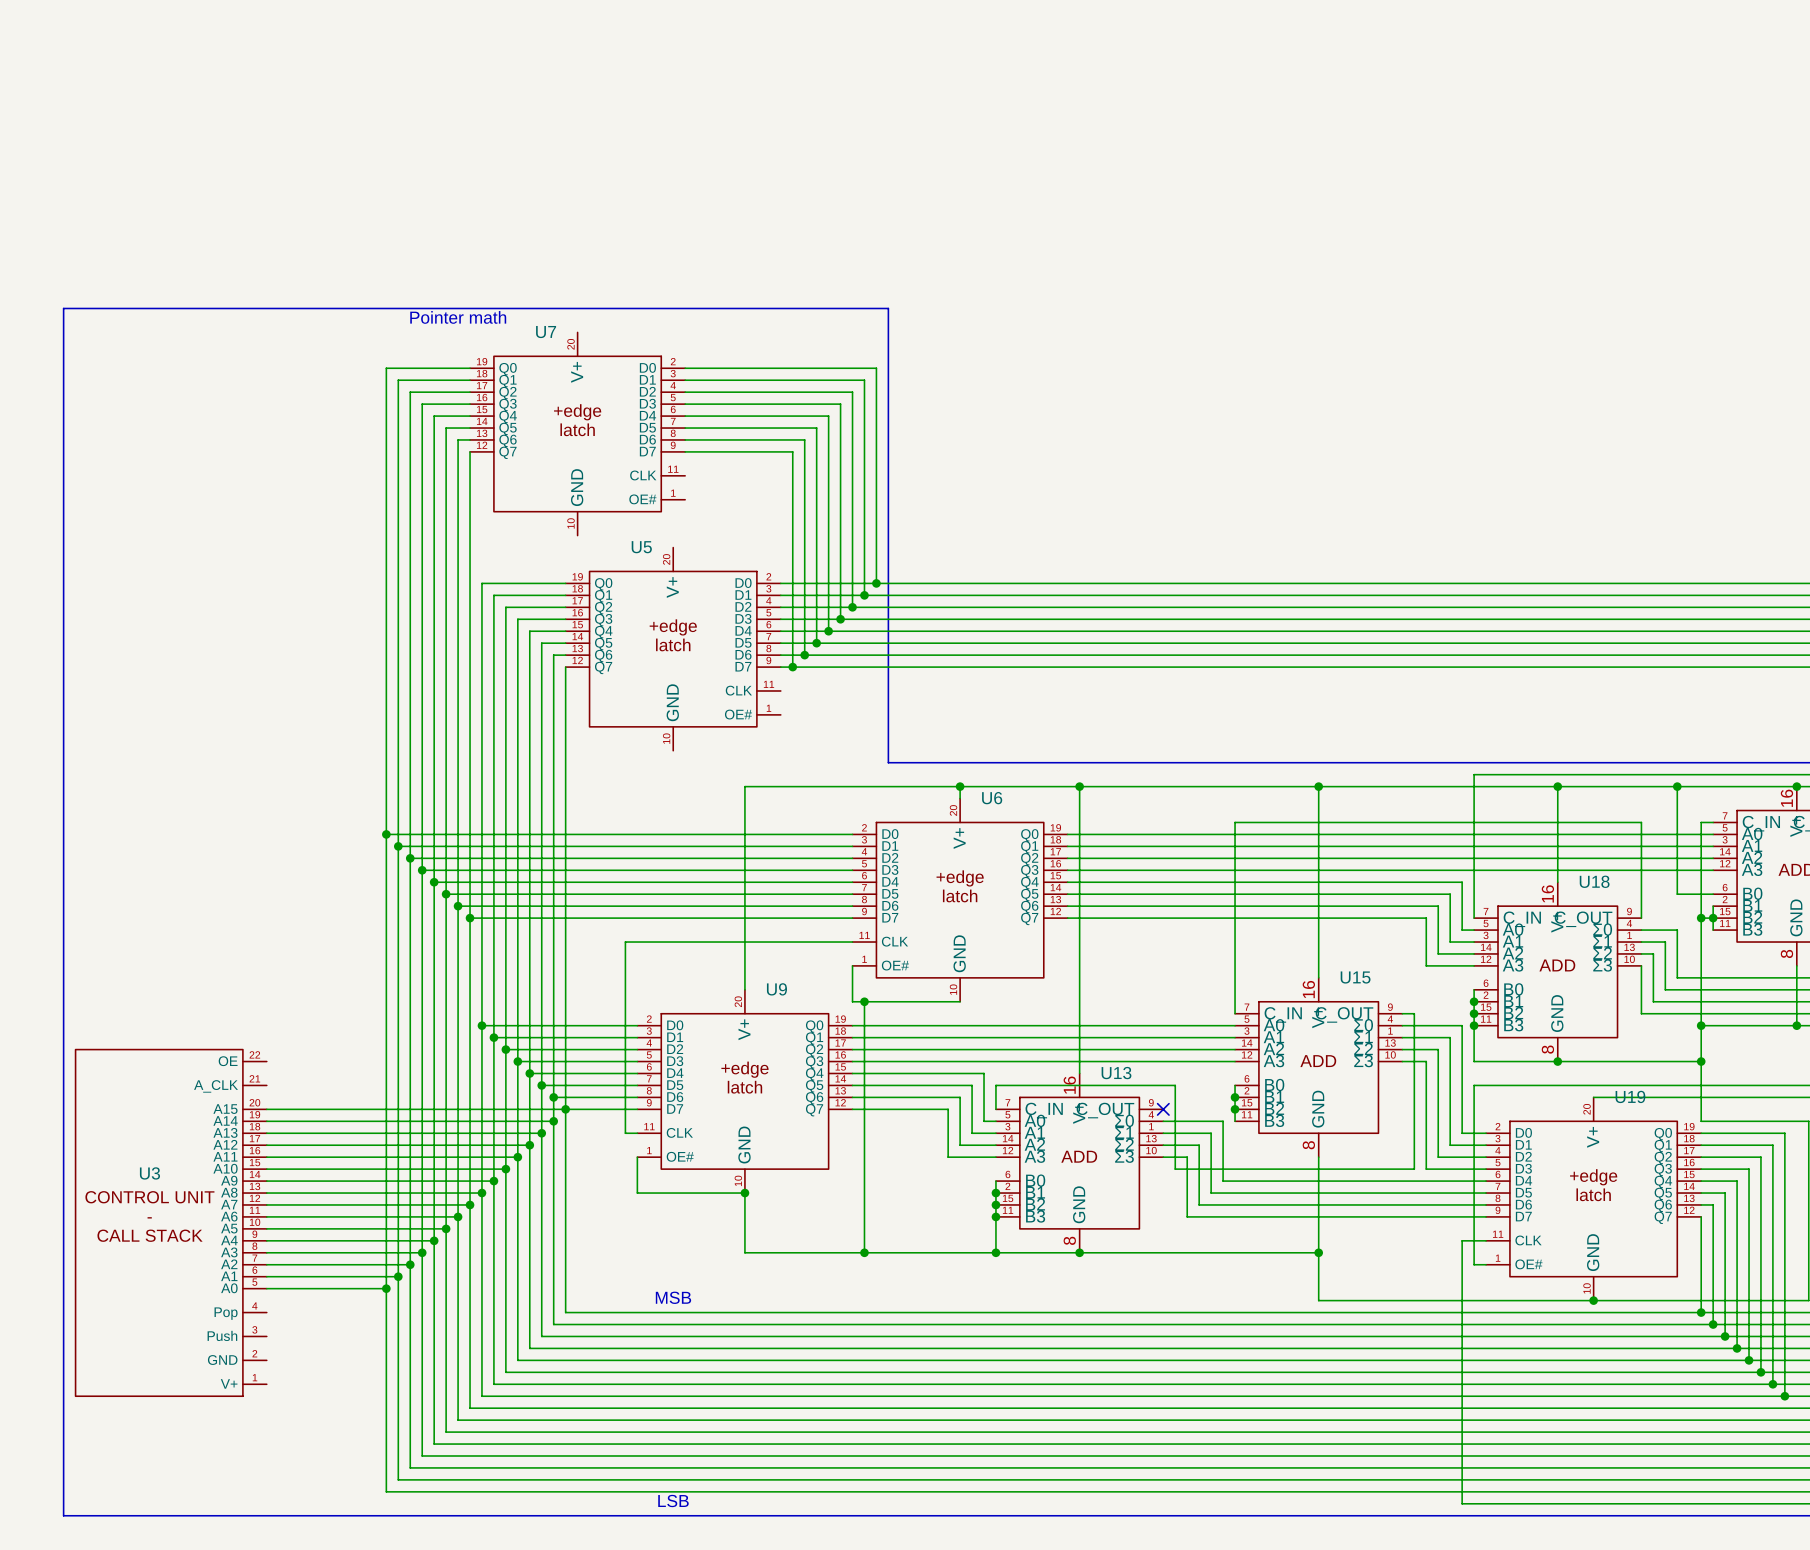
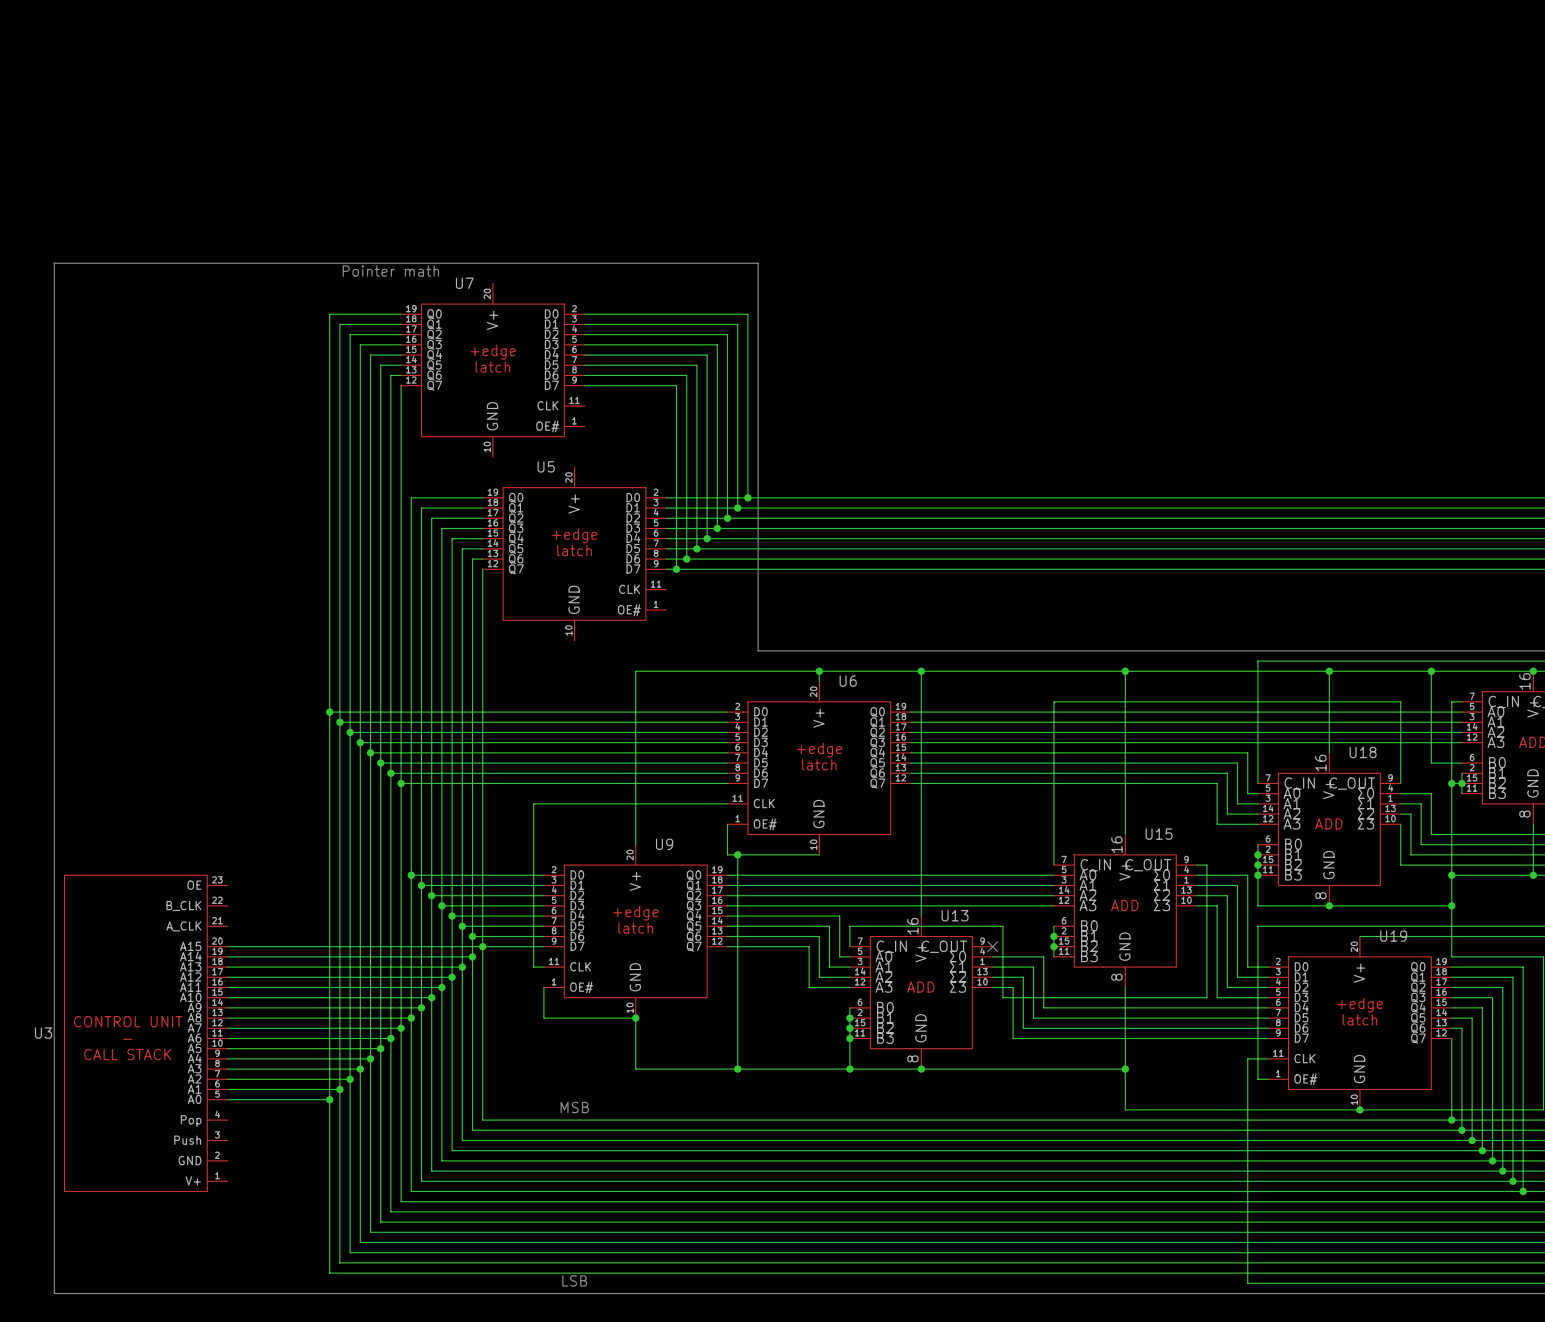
U3 symbol: [75, 1049, 267, 1397] -> [64, 875, 228, 1192]
U3 name position: U3 (149, 1173) -> U3 (43, 1033)

